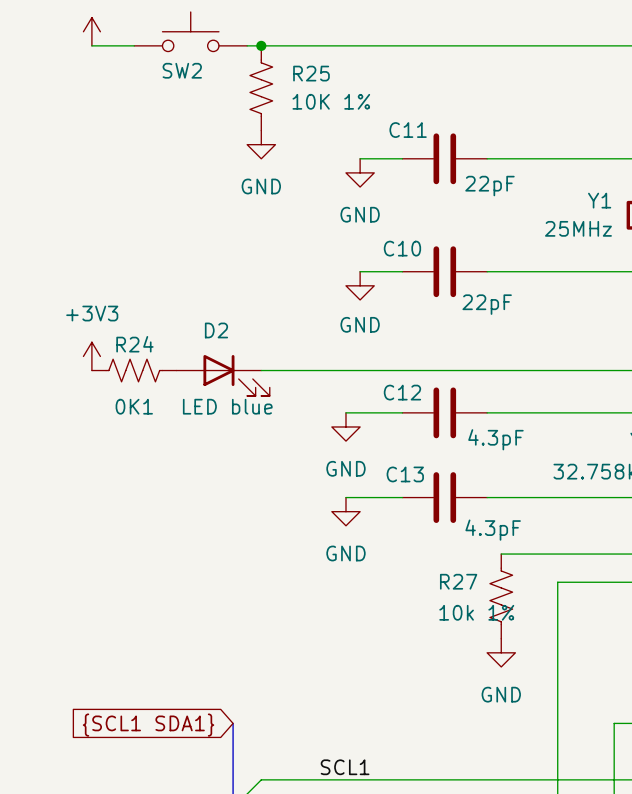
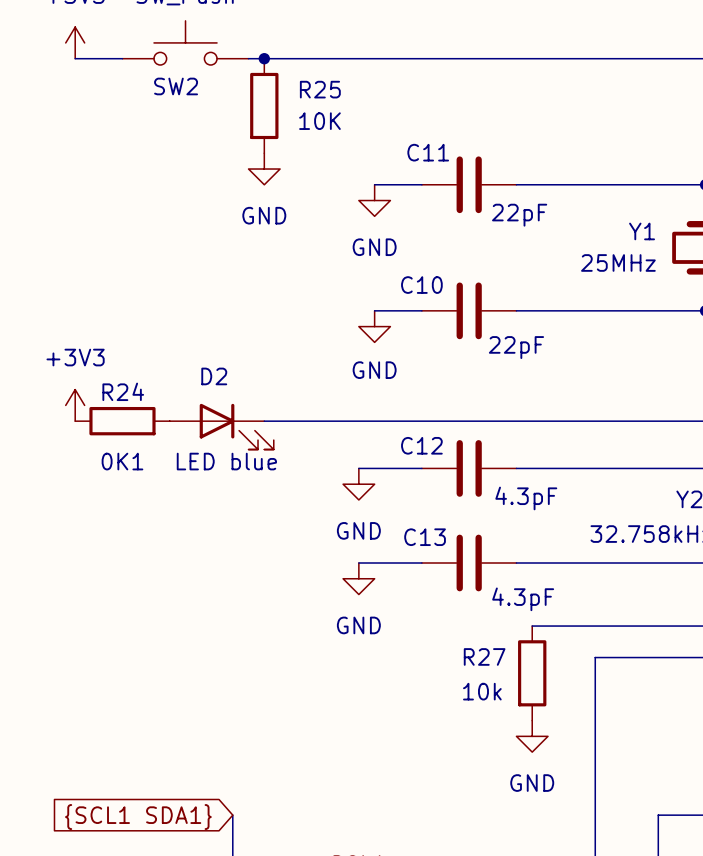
R25 symbol: [250, 45, 273, 131] -> [250, 58, 279, 154]
R25 value: 10K 1% (331, 101) -> 10K (319, 121)
R24 symbol: [91, 359, 177, 382] -> [75, 406, 170, 436]
R27 symbol: [489, 554, 513, 639] -> [518, 626, 547, 721]
R27 value: 10k 1% (476, 612) -> 10k (482, 691)

